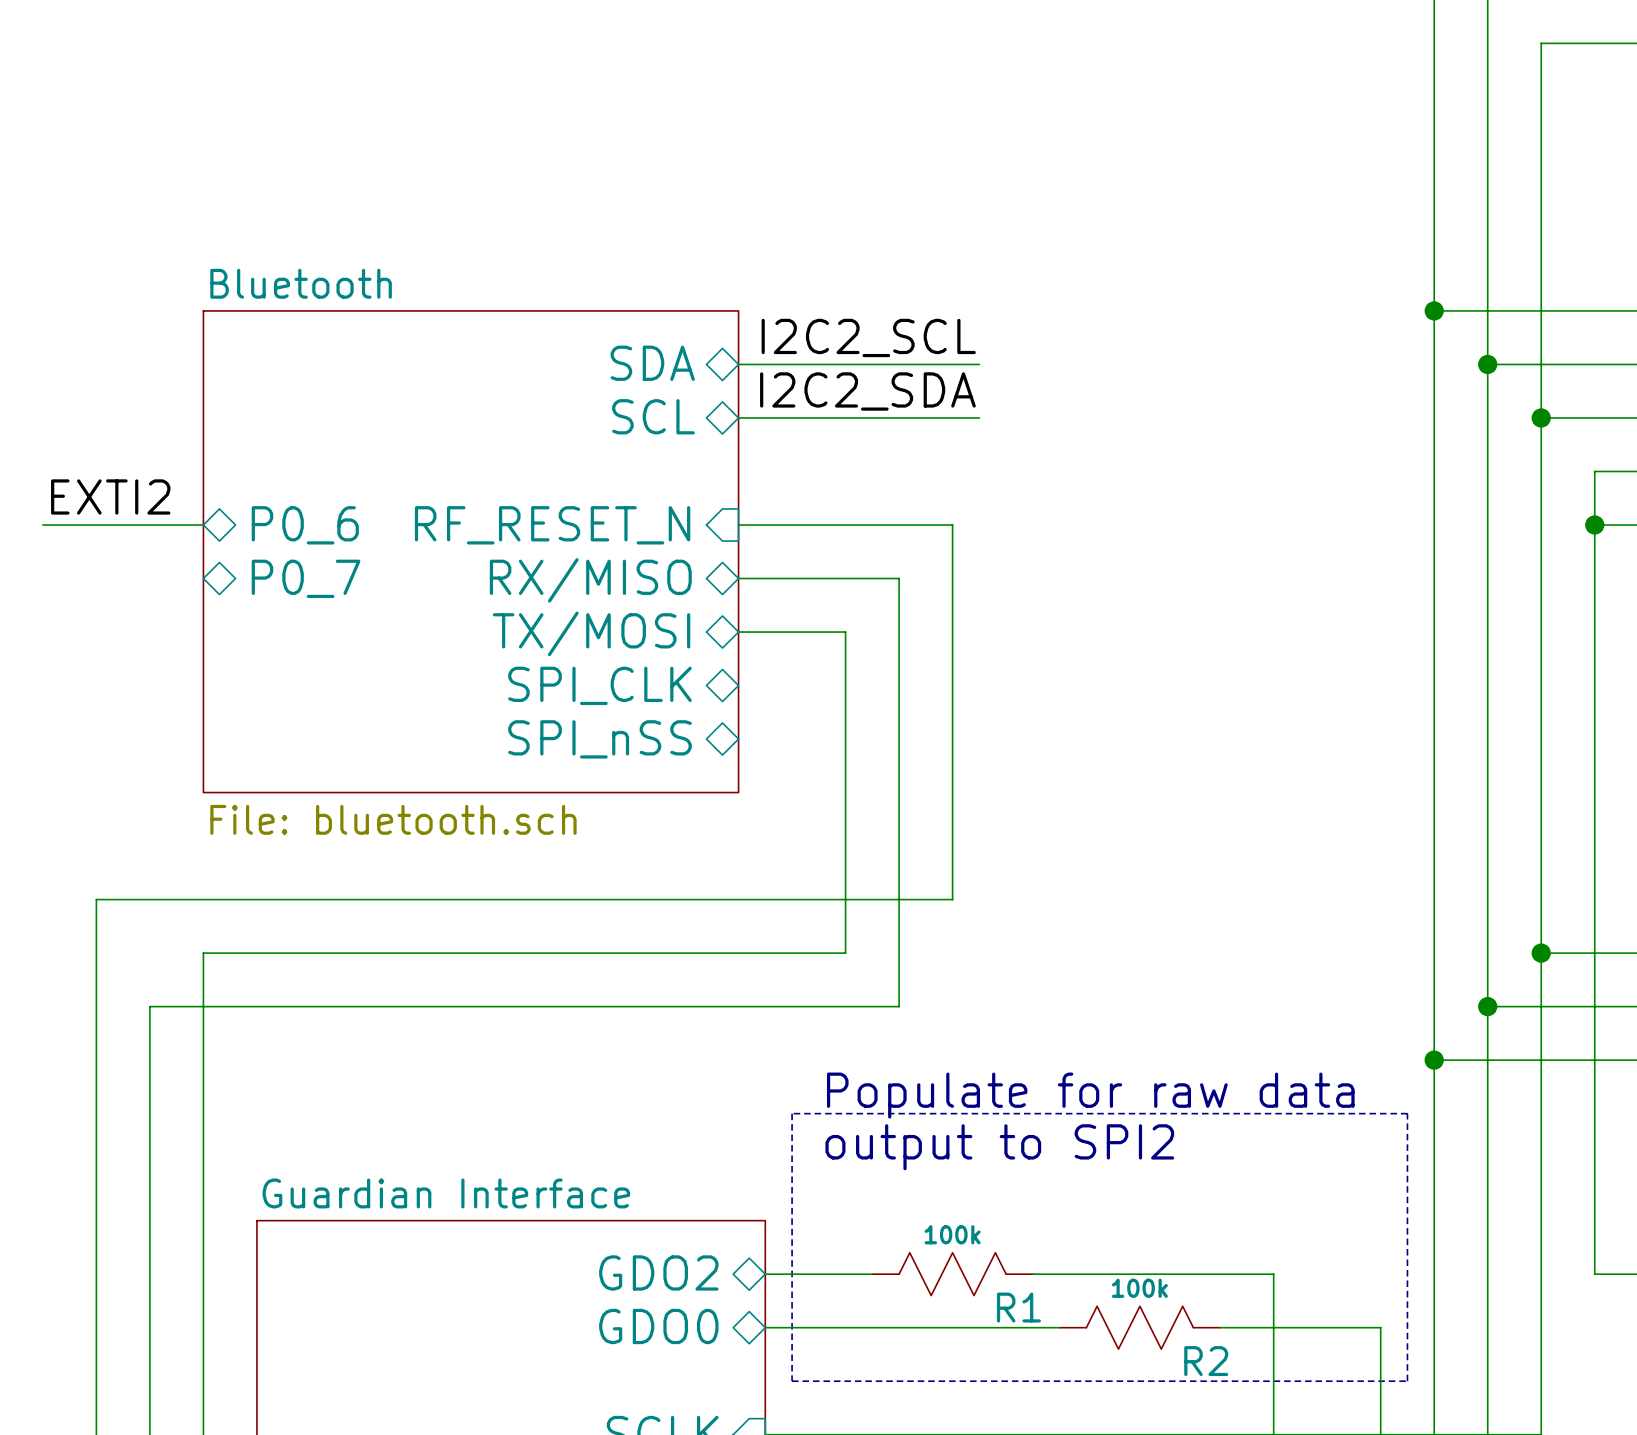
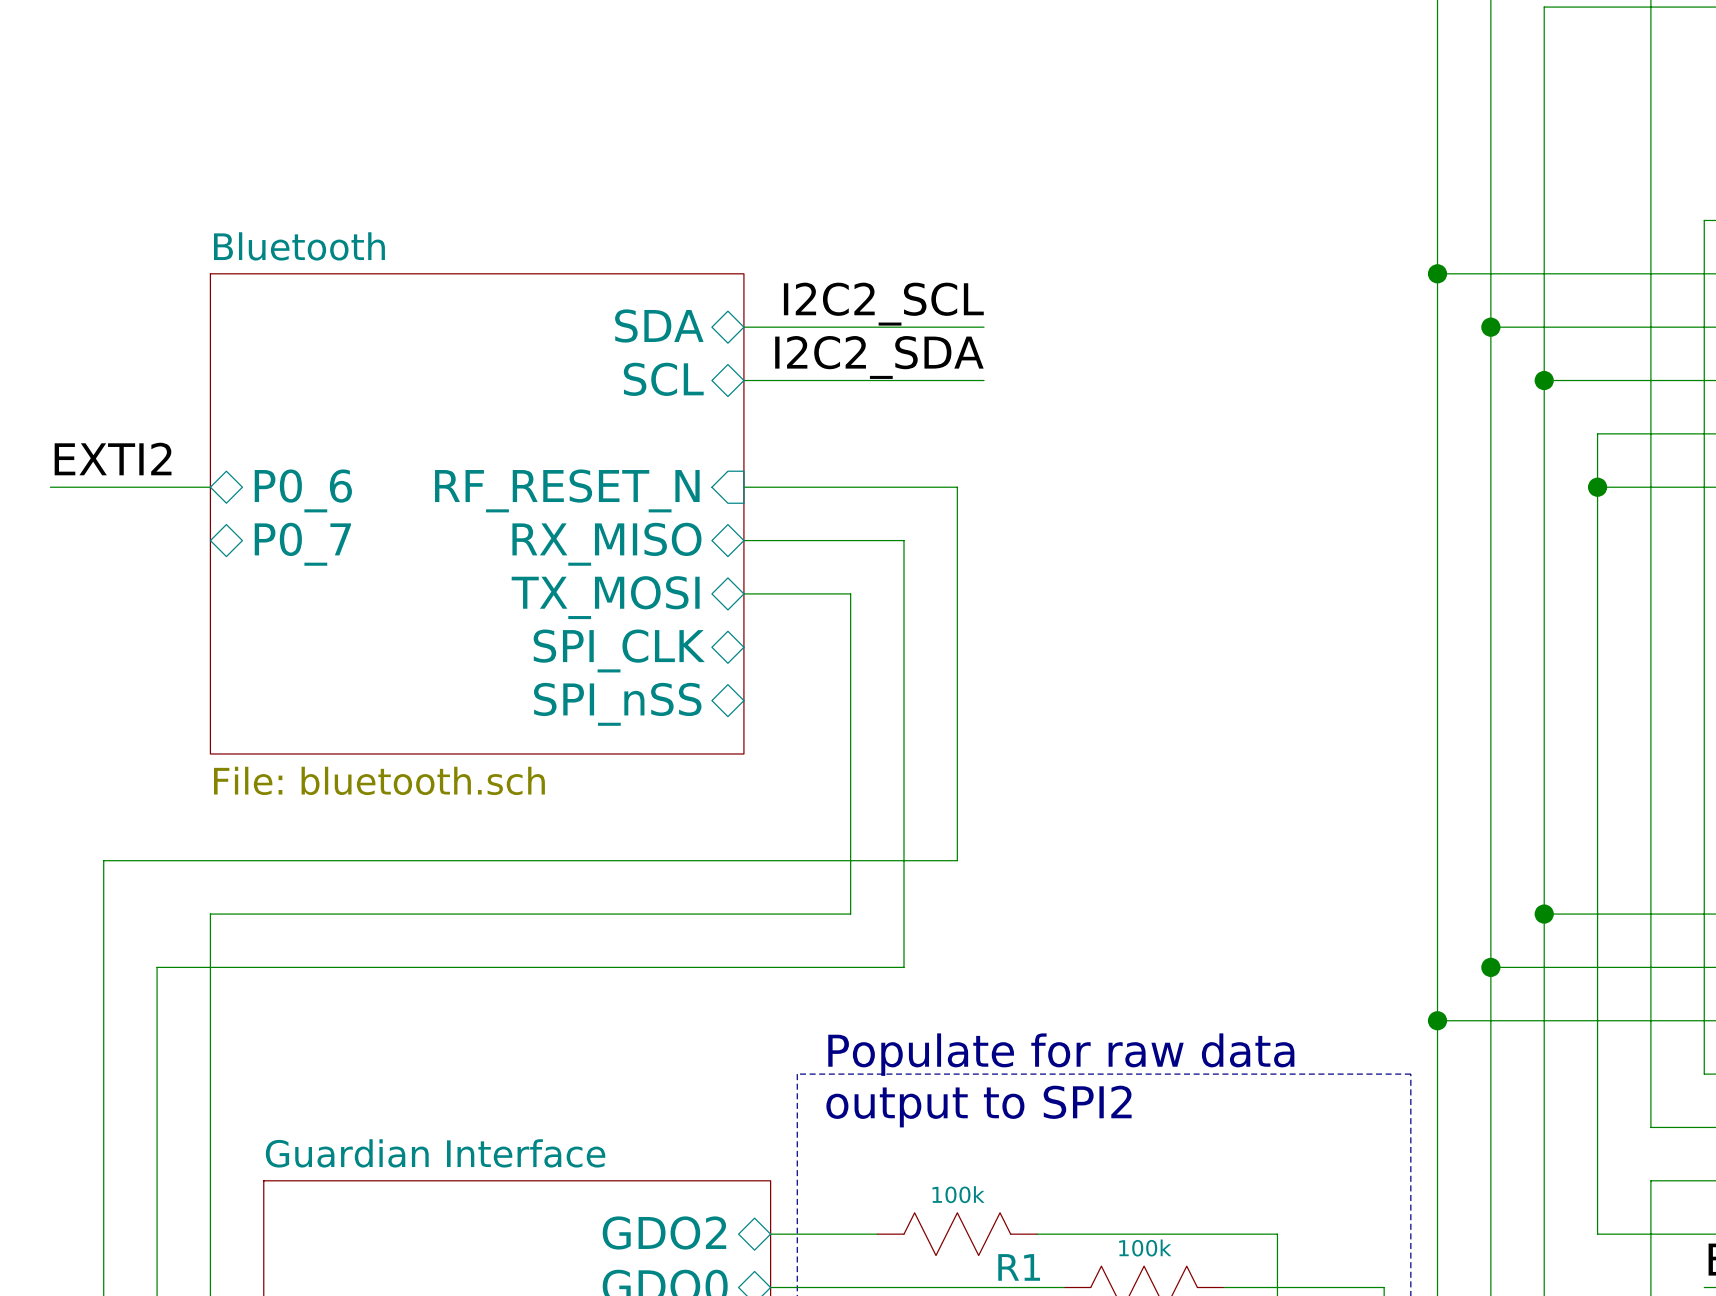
sheet pin: RX/MISO (590, 580) -> RX_MISO (606, 544)
sheet pin: TX/MOSI (591, 633) -> TX_MOSI (605, 597)

